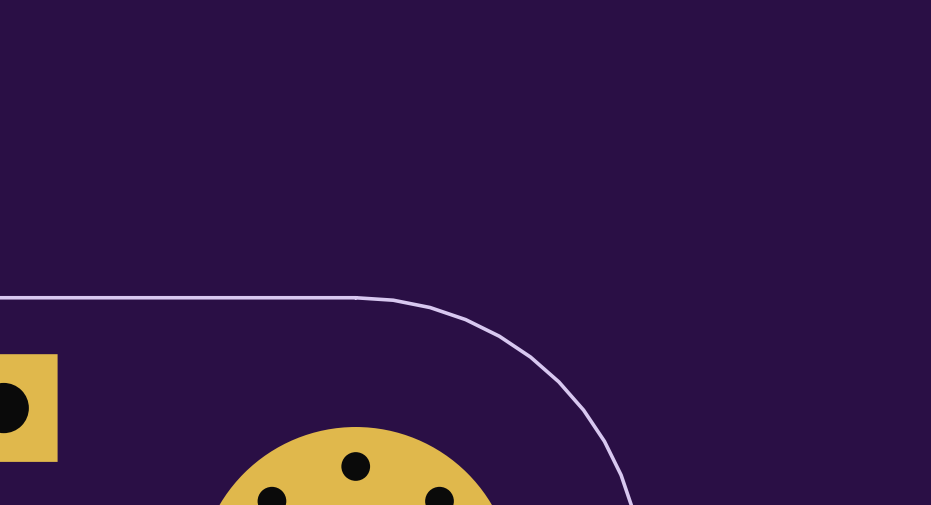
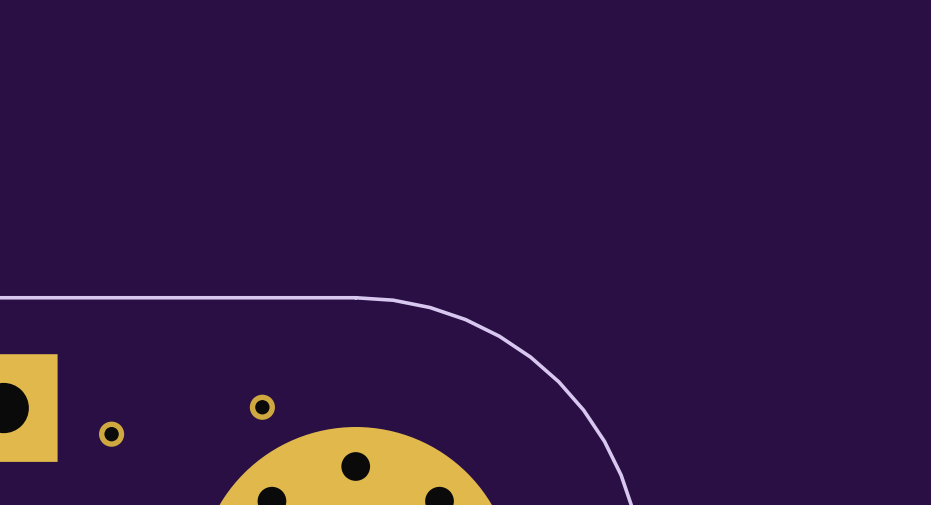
via: none -> (262, 407)
via: none -> (111, 434)

